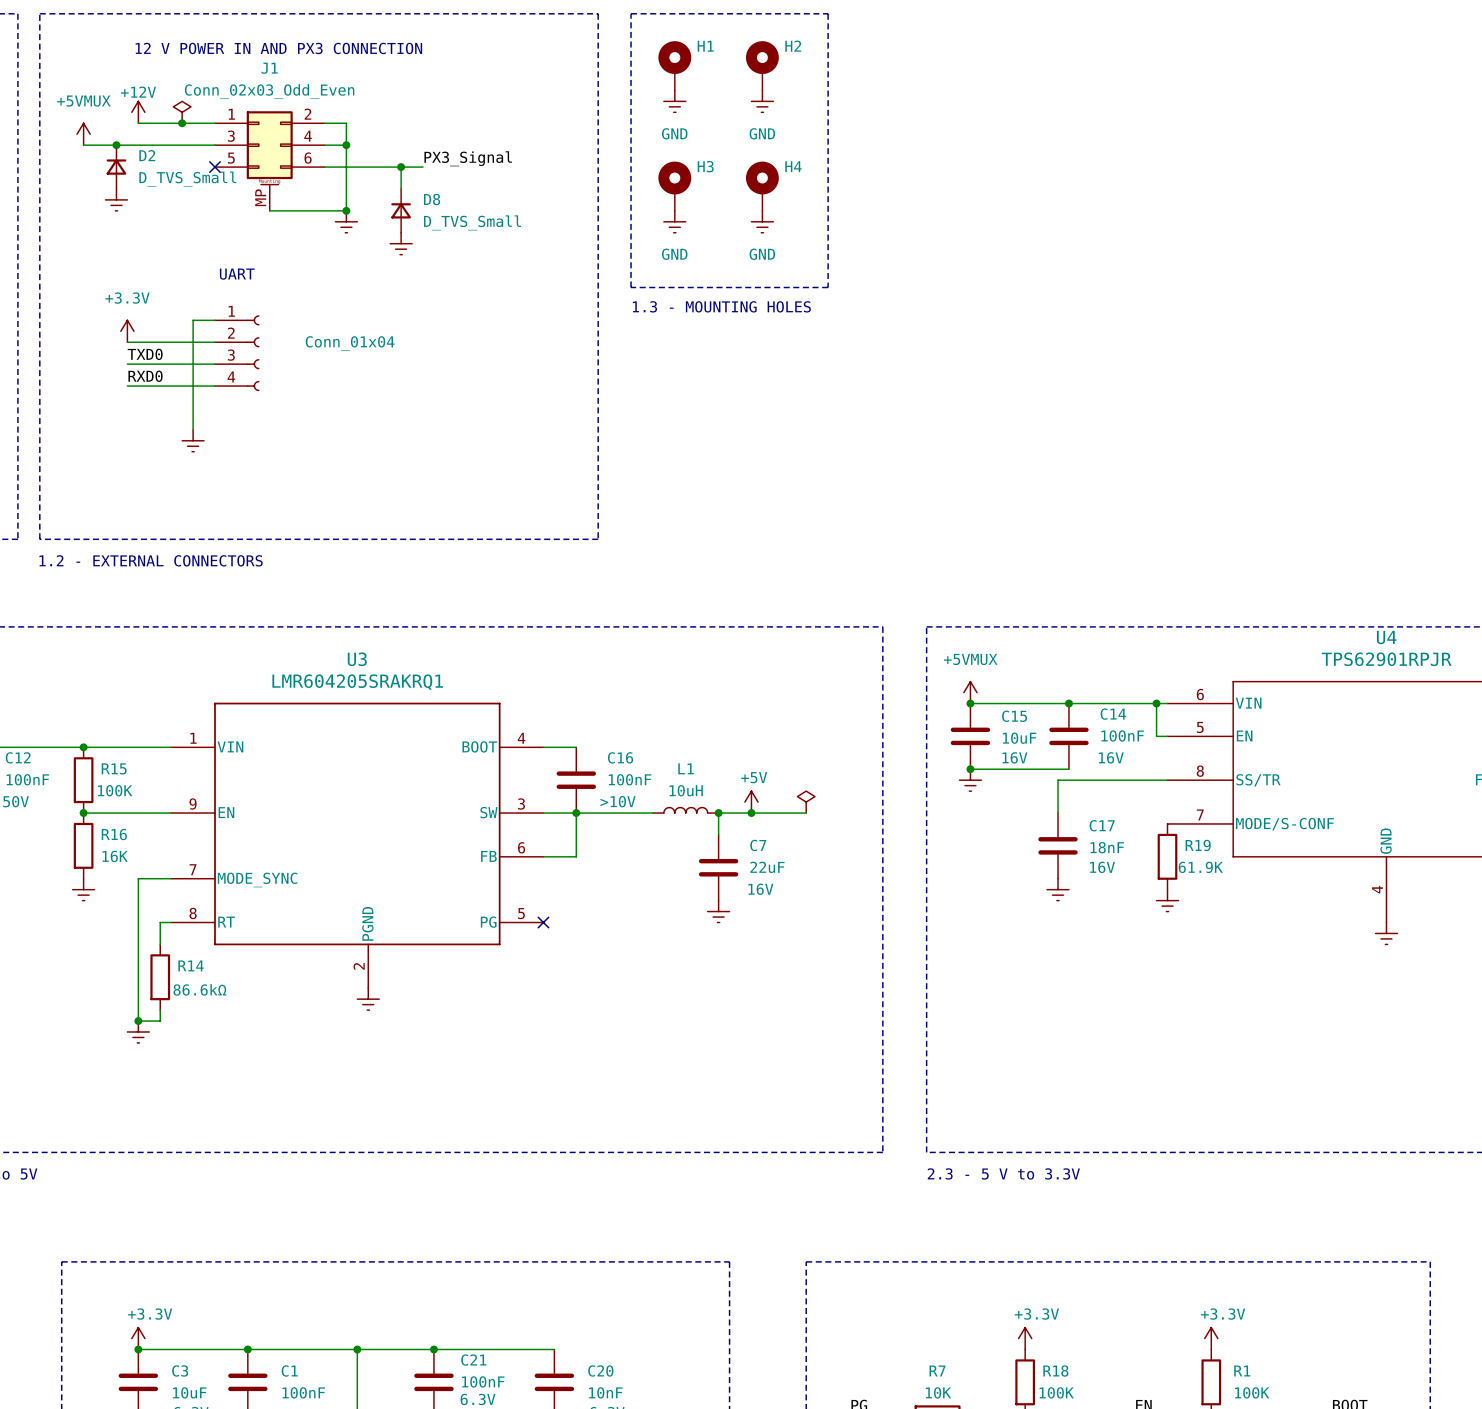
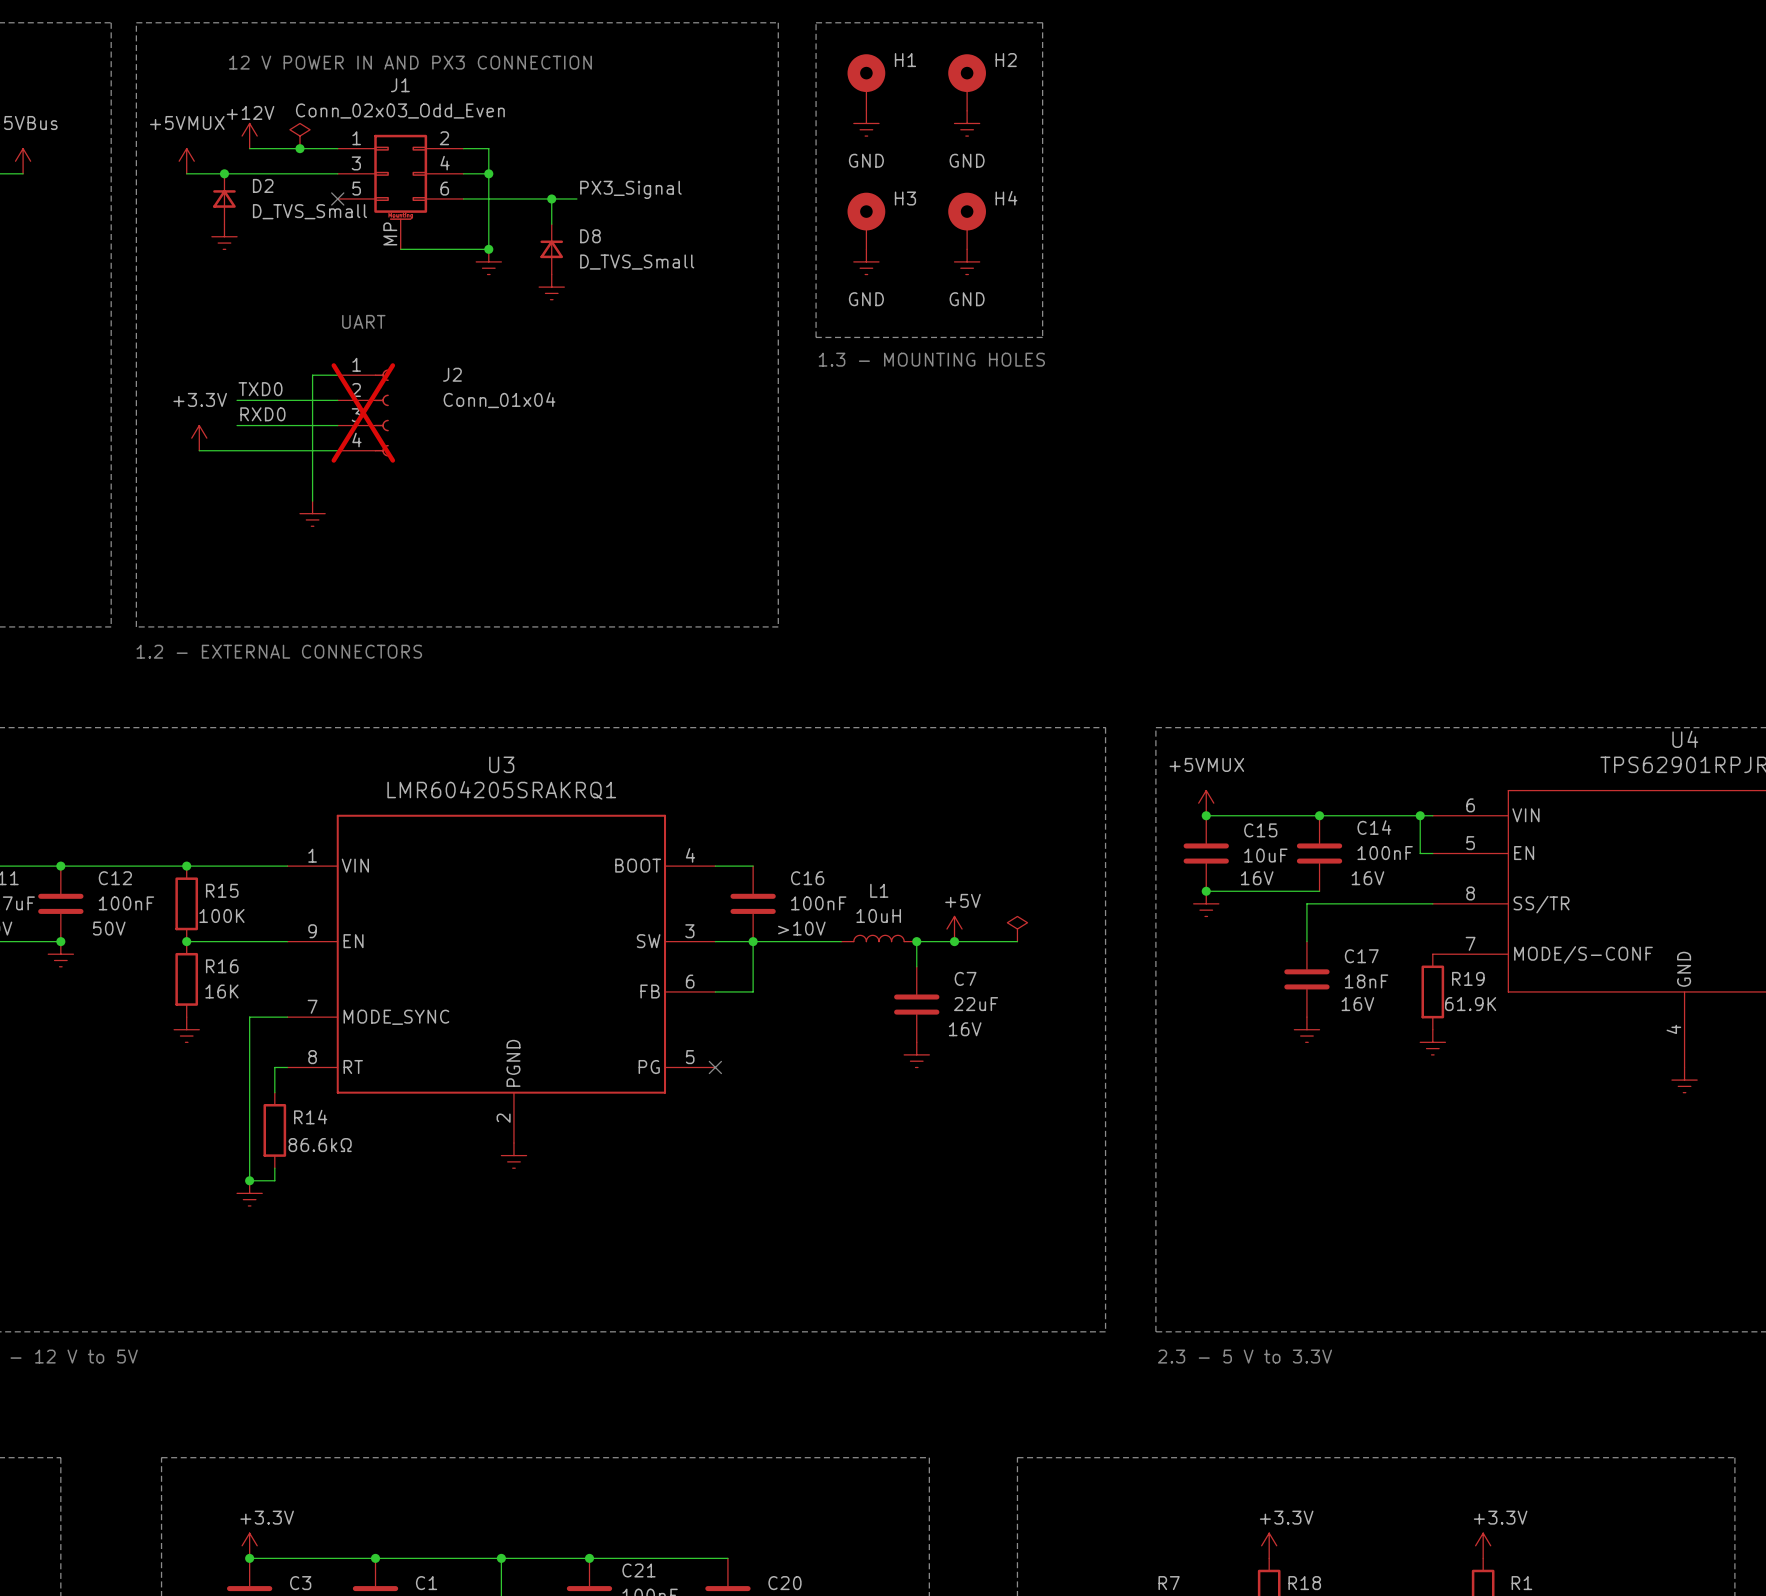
J2 name: none -> J2 (452, 374)
power symbol position: +3.3V (127, 331) -> +3.3V (199, 438)
label: none -> TXD0 (260, 389)
J2 do-not-place cross: none -> (363, 412)
label: TXD0 (145, 354) -> RXD0 (262, 414)
label: RXD0 (145, 376) -> none
wire: none -> (199, 450) (237, 450)

